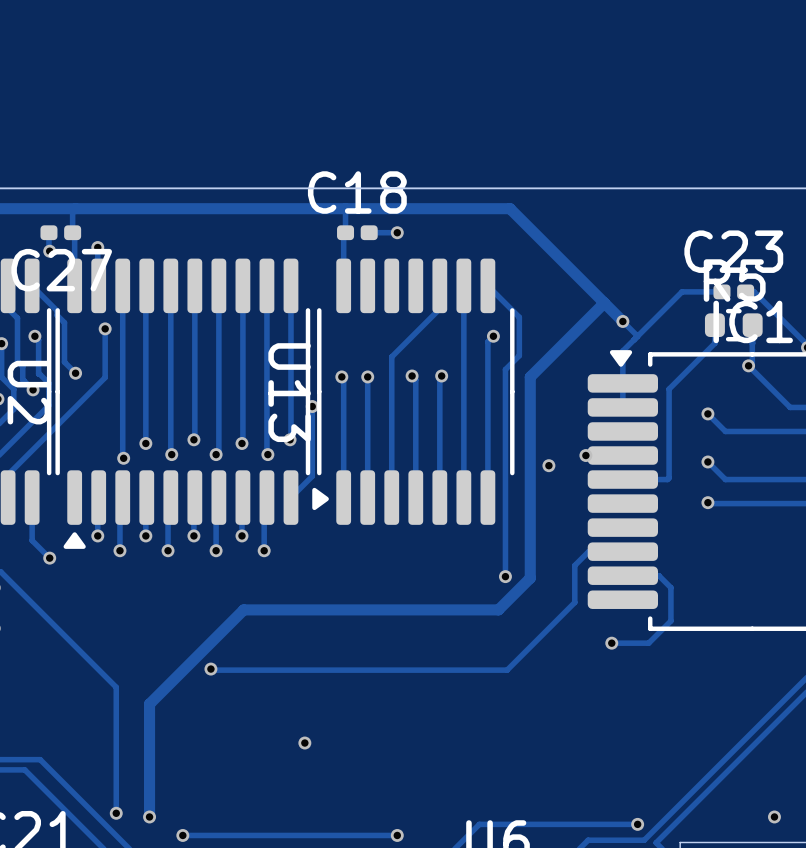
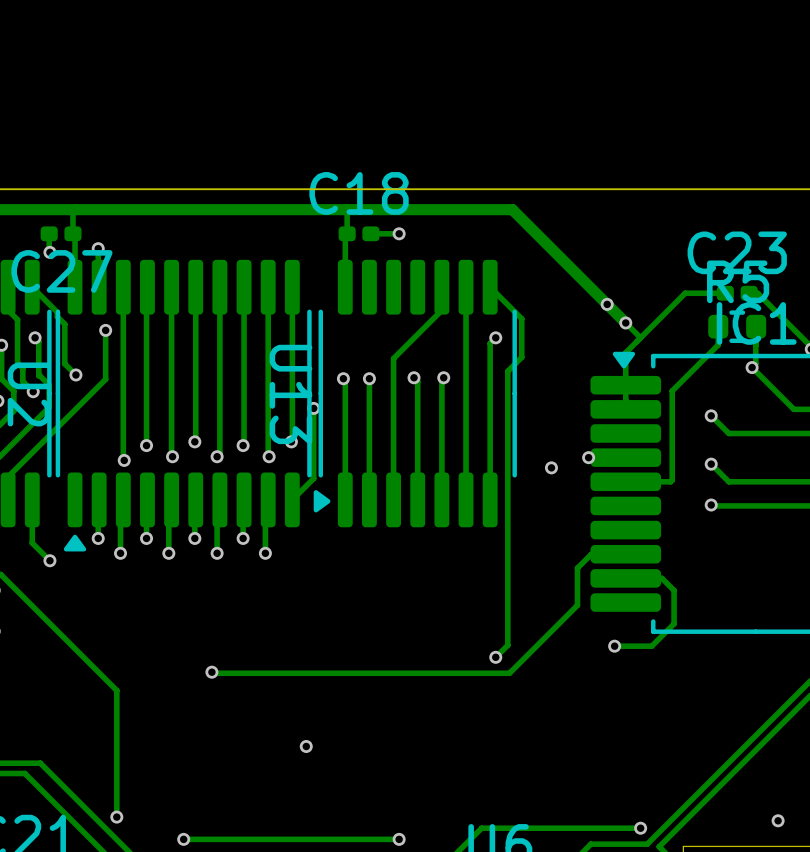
track: (604, 302) (530, 377) (530, 578) (498, 609) (243, 609) (149, 704) (149, 816) -> none
via: none -> (607, 304)
track: none -> (507, 579) (507, 645) (495, 657)
via position: (505, 576) -> (495, 657)
via: (149, 816) -> none

